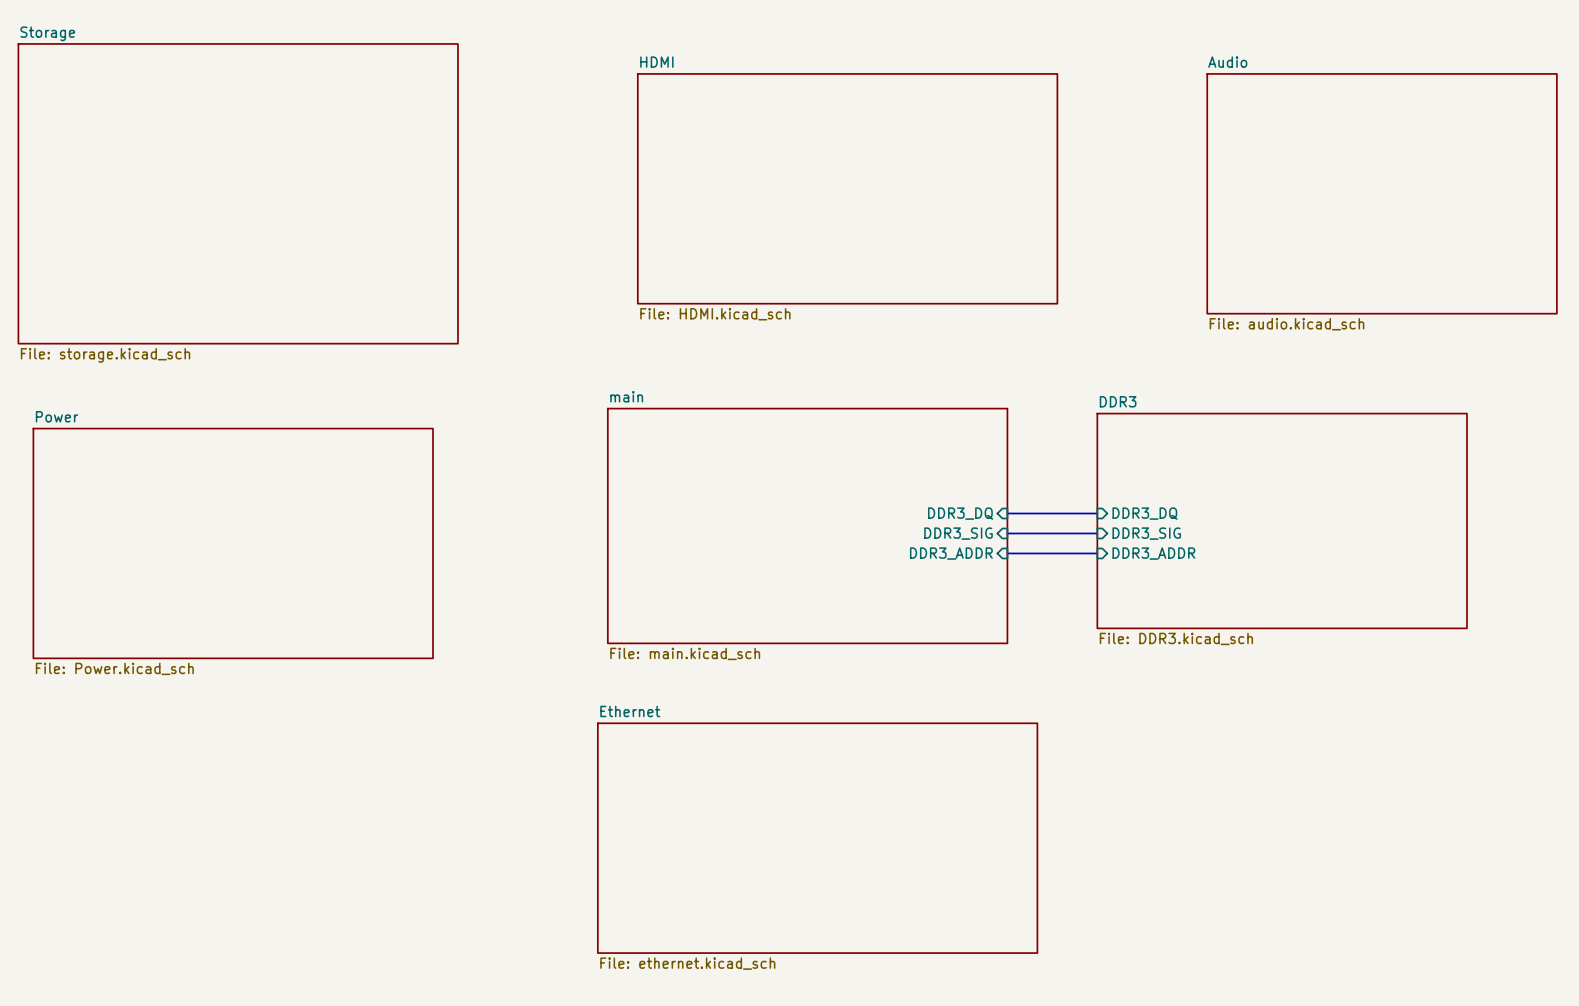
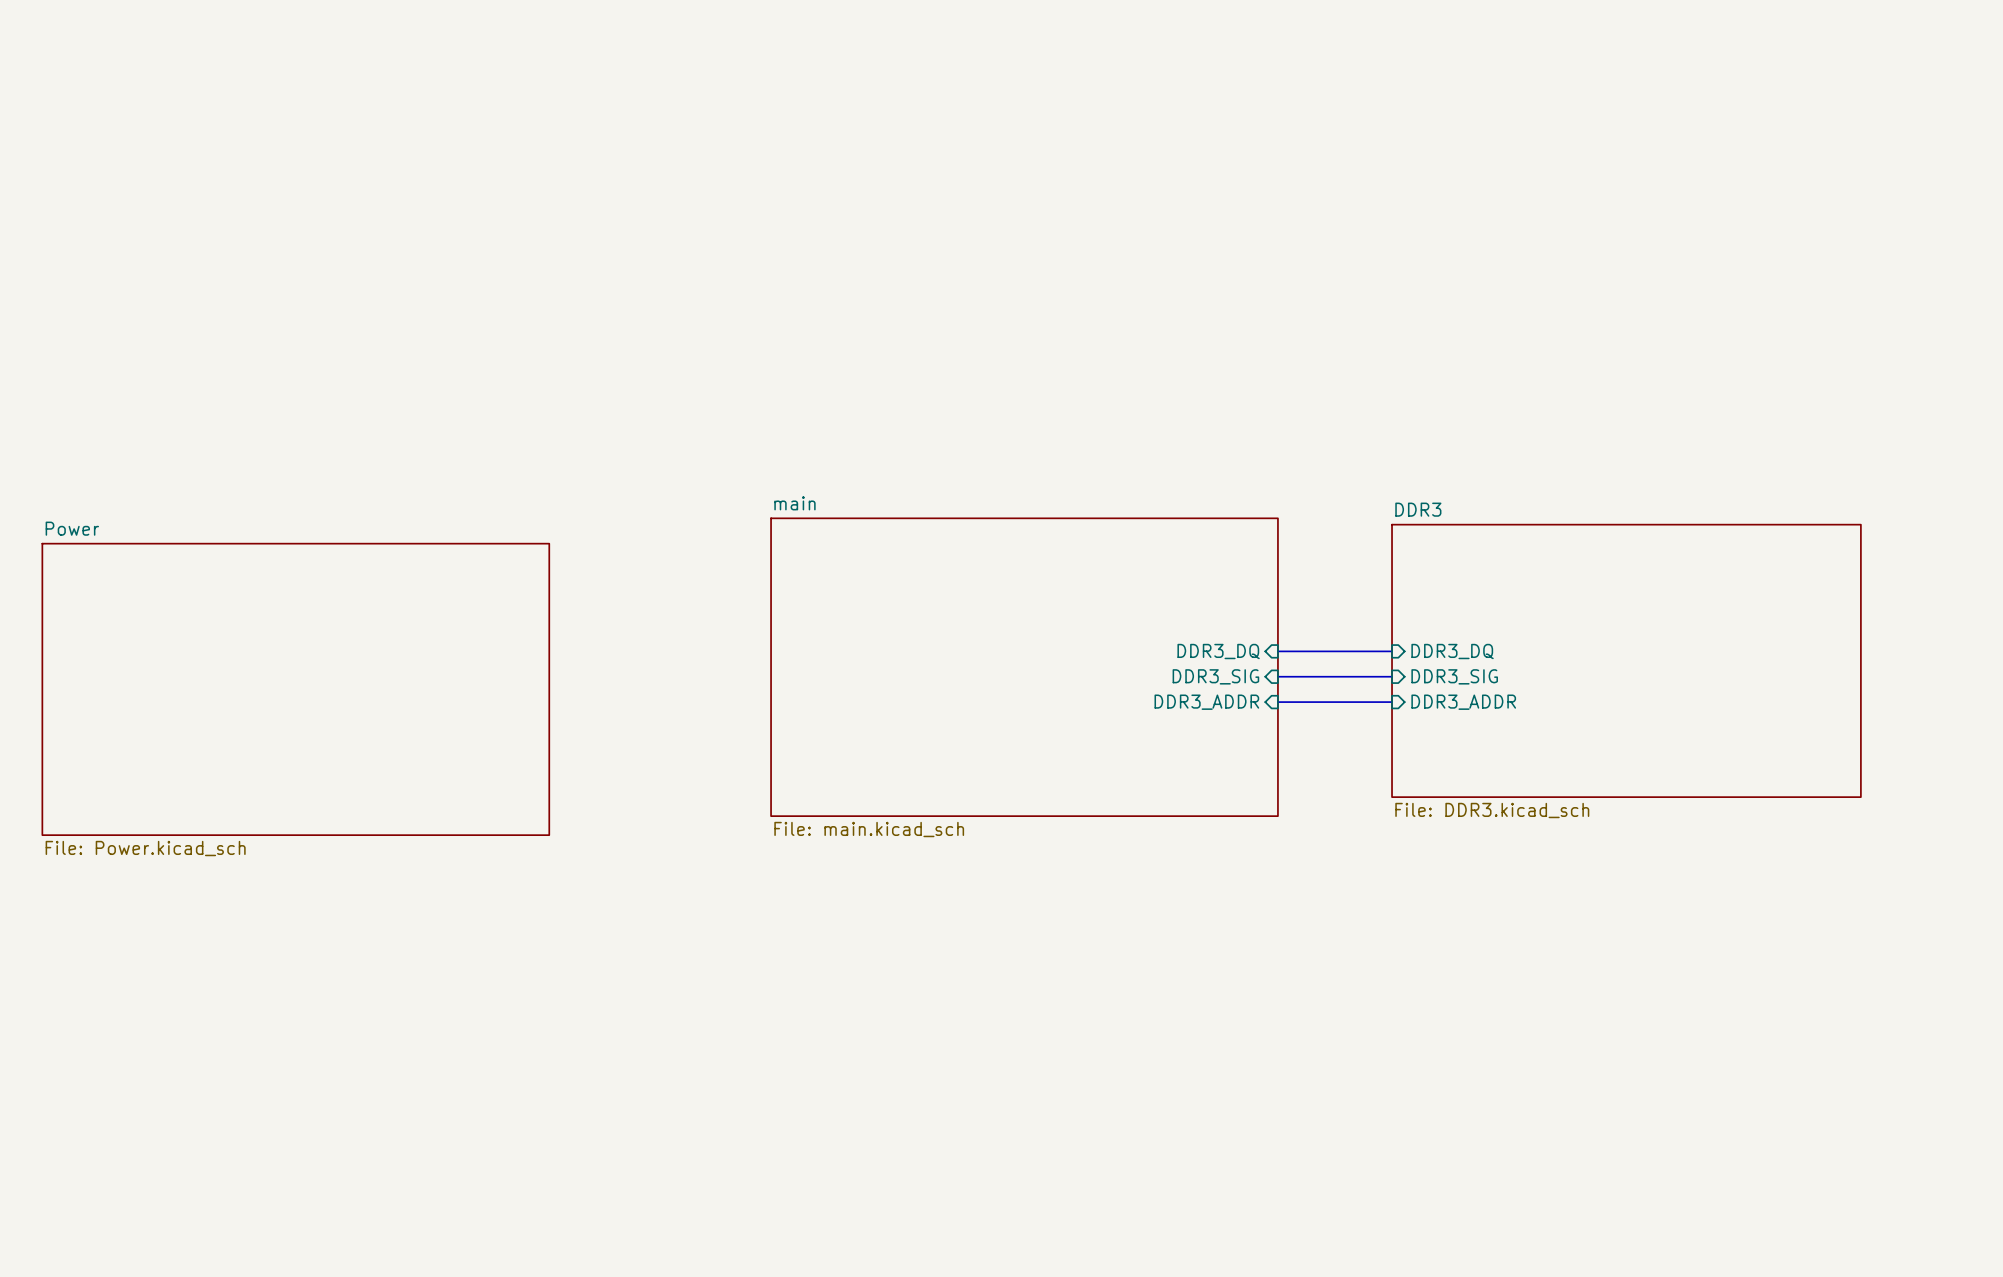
sheet HDMI: File: HDMI.kicad_sch (847, 188) -> none
sheet Storage: File: storage.kicad_sch (238, 193) -> none
sheet Audio: File: audio.kicad_sch (1382, 193) -> none
sheet Ethernet: File: ethernet.kicad_sch (817, 838) -> none

